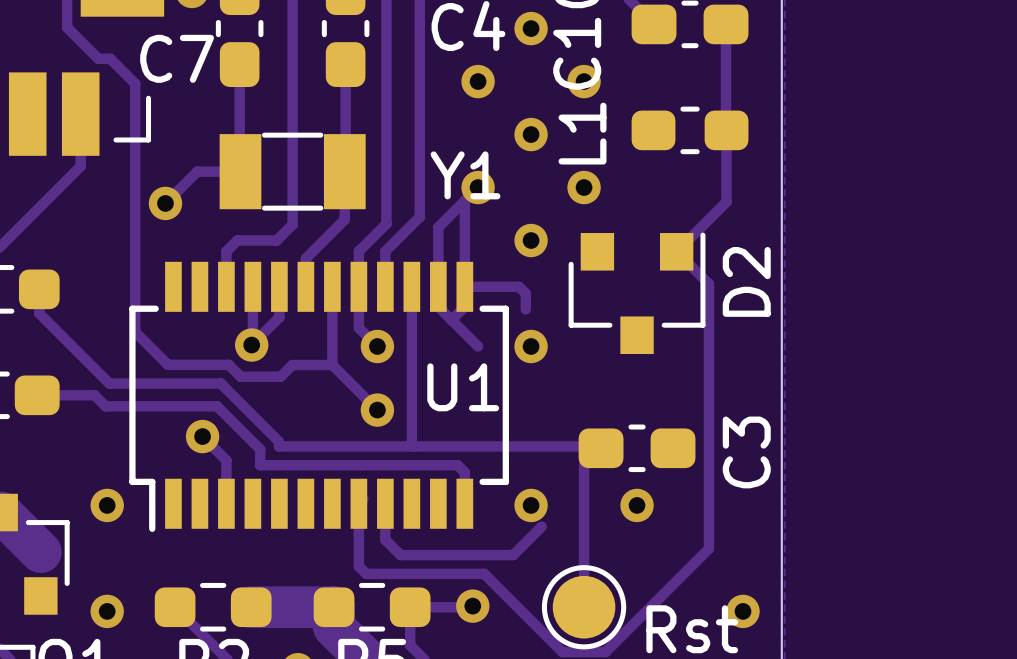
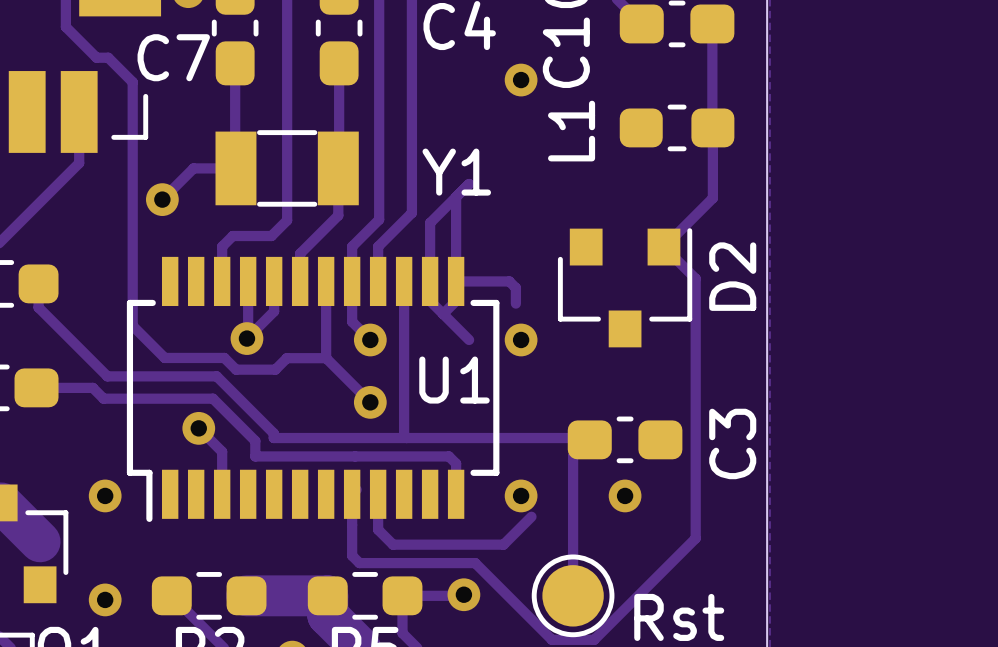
via: (531, 28) -> none
via: (478, 81) -> none
via: none -> (521, 80)
via: (584, 81) -> none
via: (531, 134) -> none
via: (478, 187) -> none
via: (584, 187) -> none
via: (531, 240) -> none
via: (743, 611) -> none

